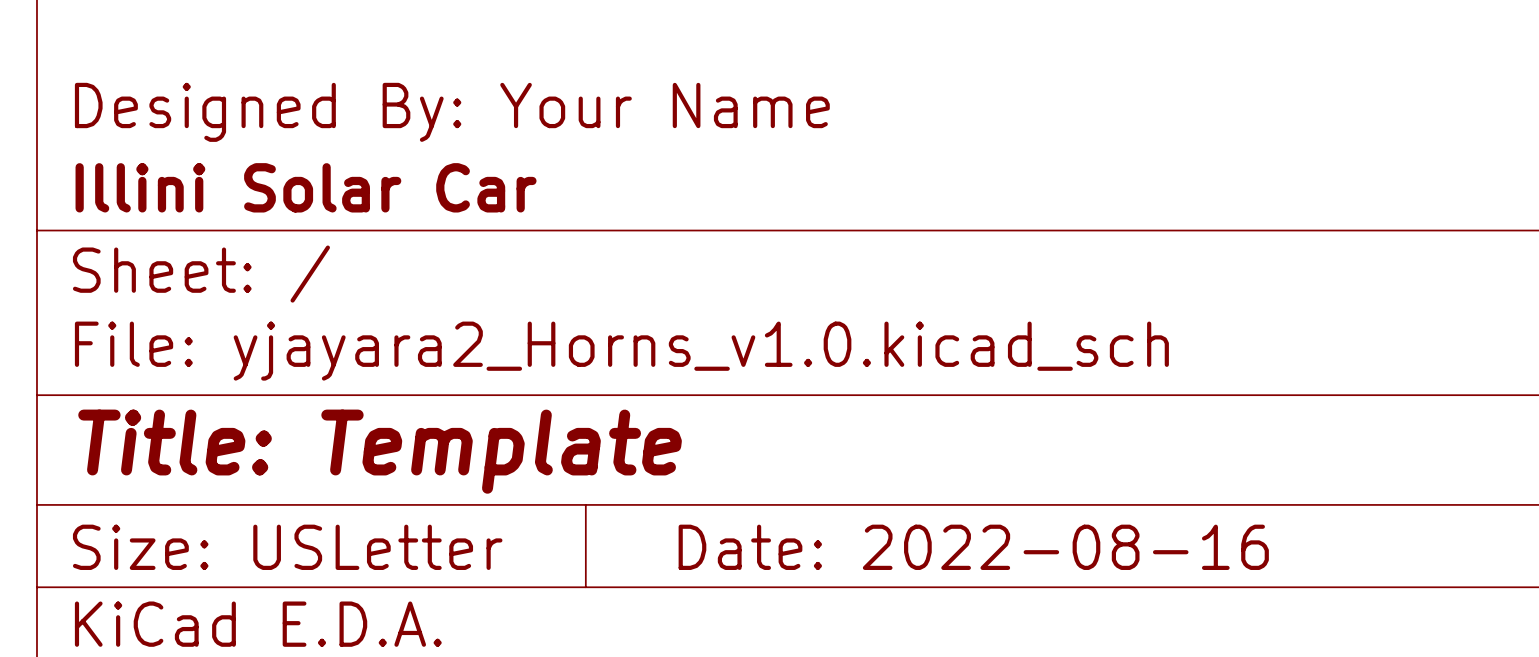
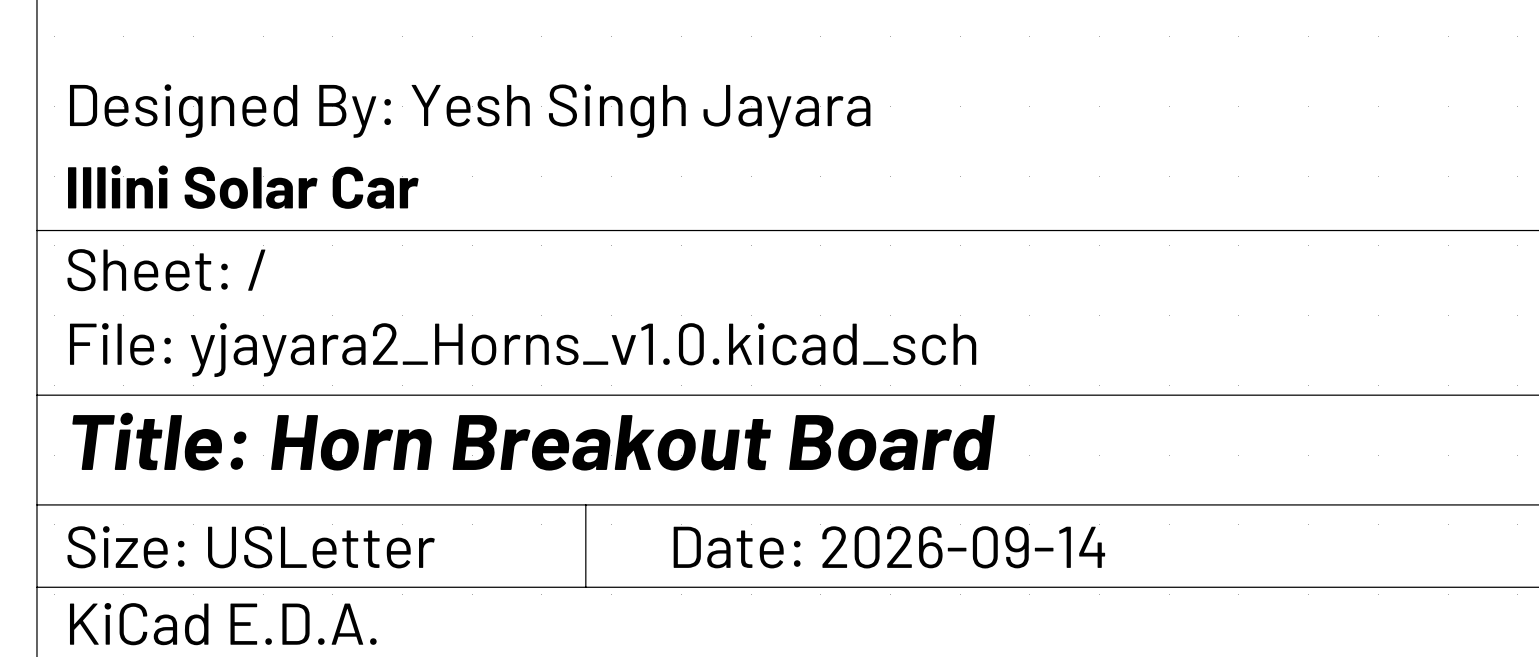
title block: Designed By: Your Name (452, 112) -> Designed By: Yesh Singh Jayara (470, 111)
title block: Title: Template (380, 451) -> Title: Horn Breakout Board (533, 441)
title block: Date: 2022-08-16 (973, 547) -> Date: 2026-09-14 (889, 547)

